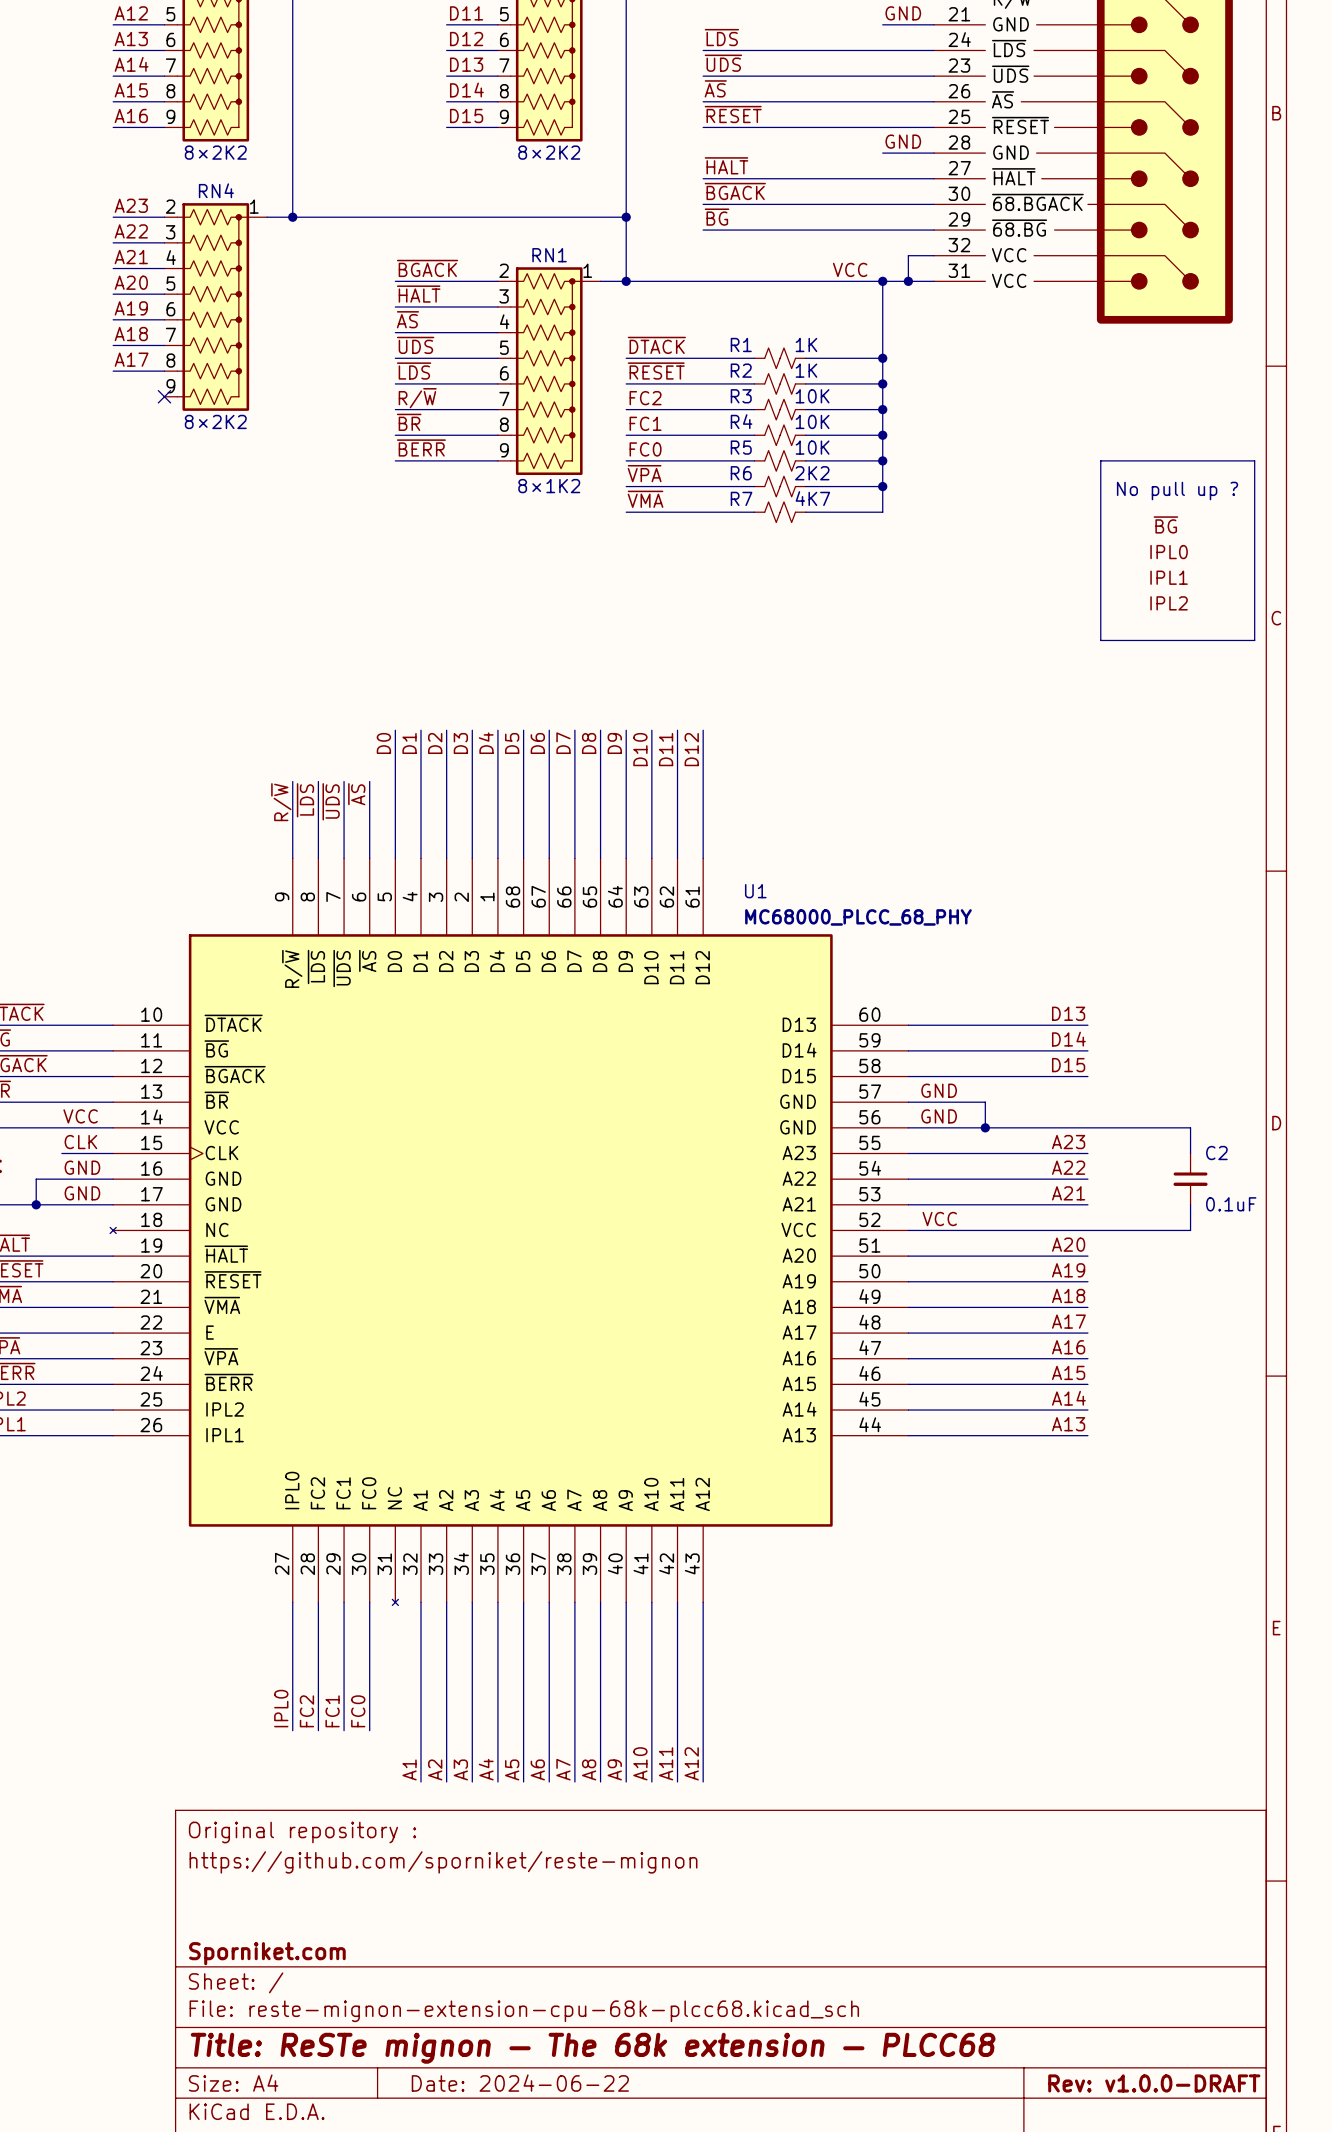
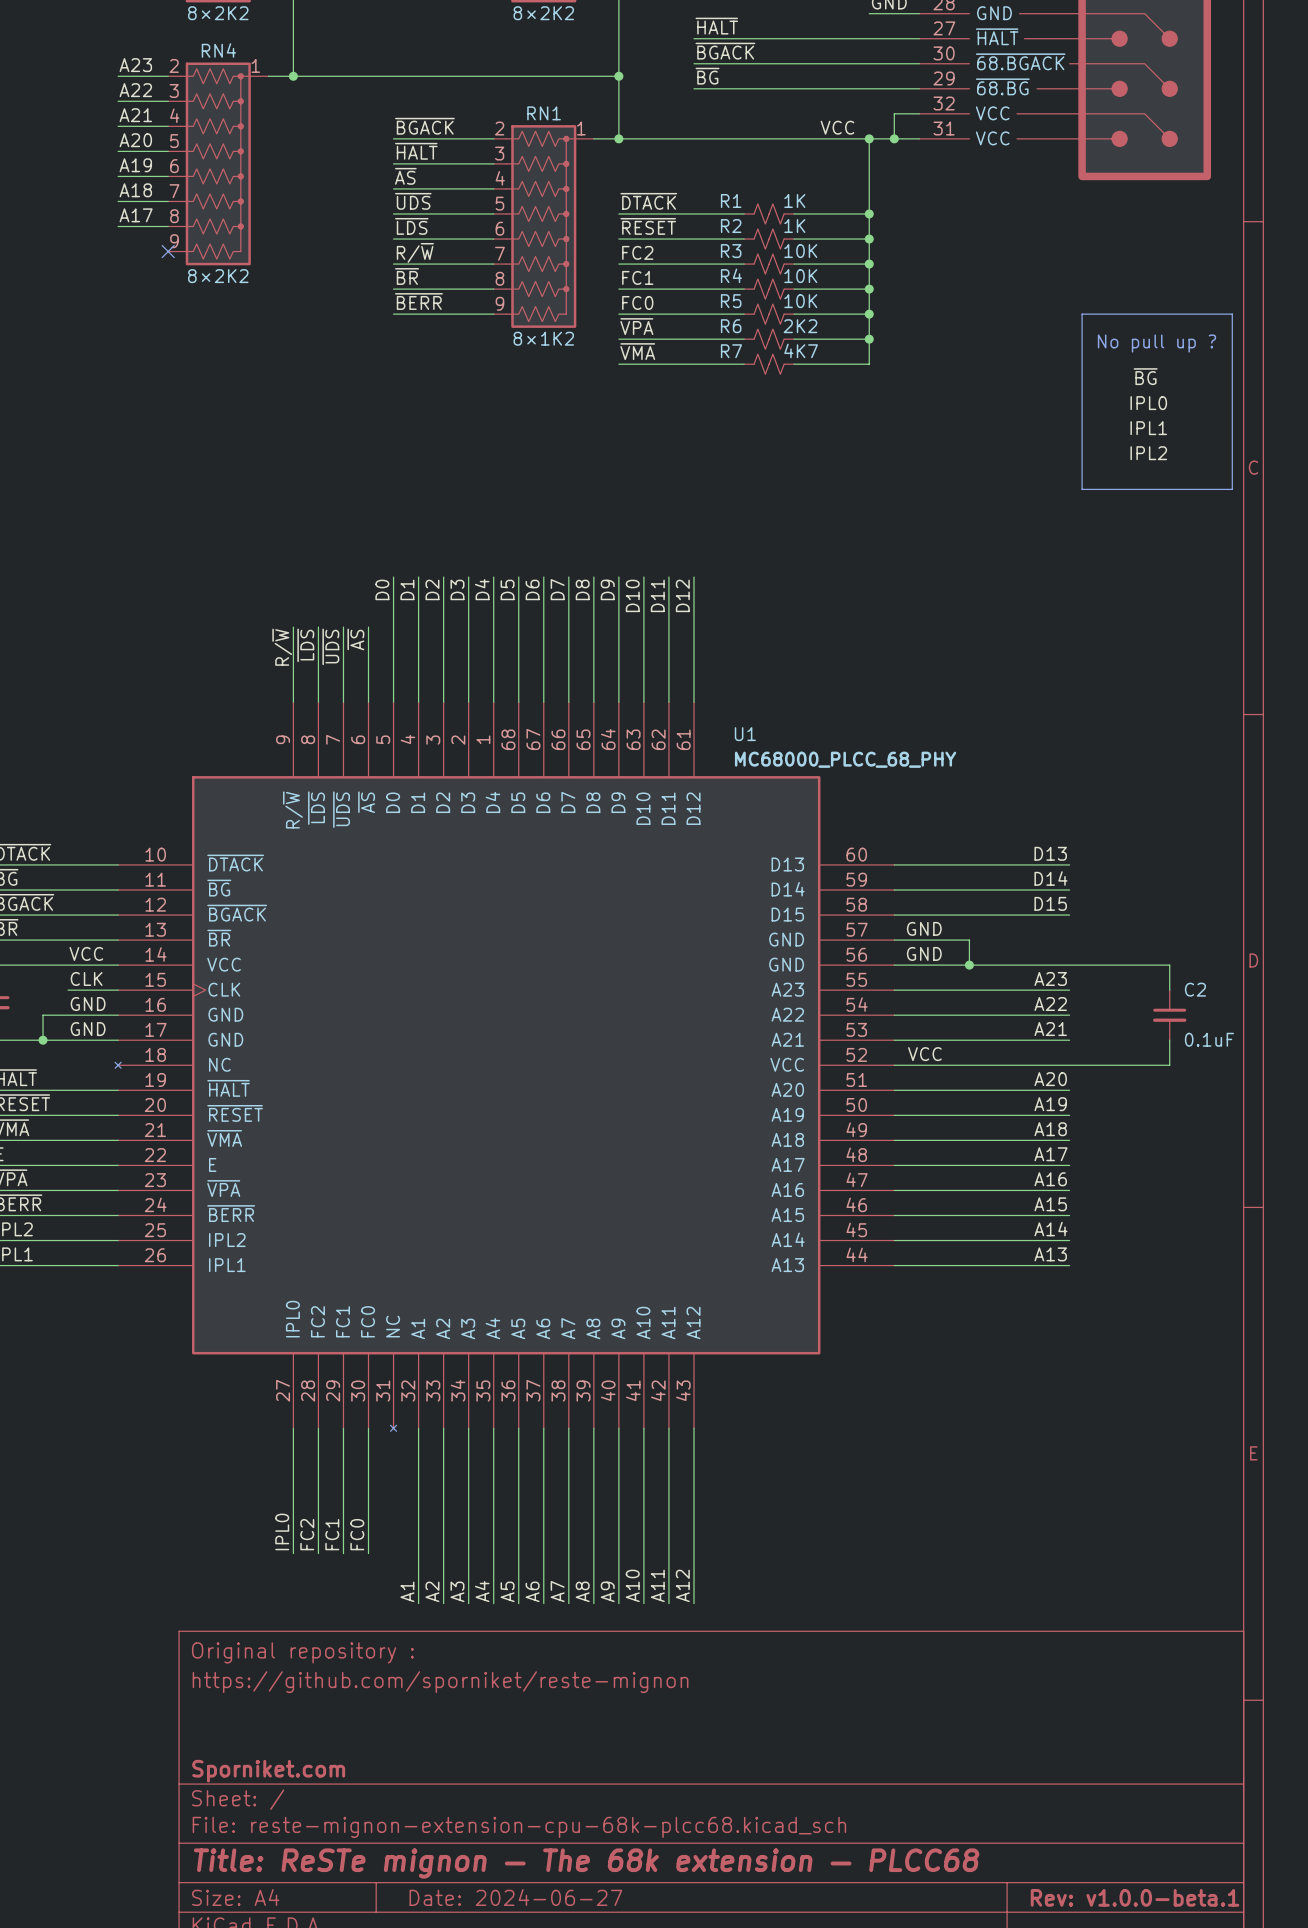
title block: Date: 2024-06-22 (520, 2083) -> Date: 2024-06-27 (515, 1897)
title block: Rev: v1.0.0-DRAFT (1154, 2083) -> Rev: v1.0.0-beta.1 (1135, 1897)

